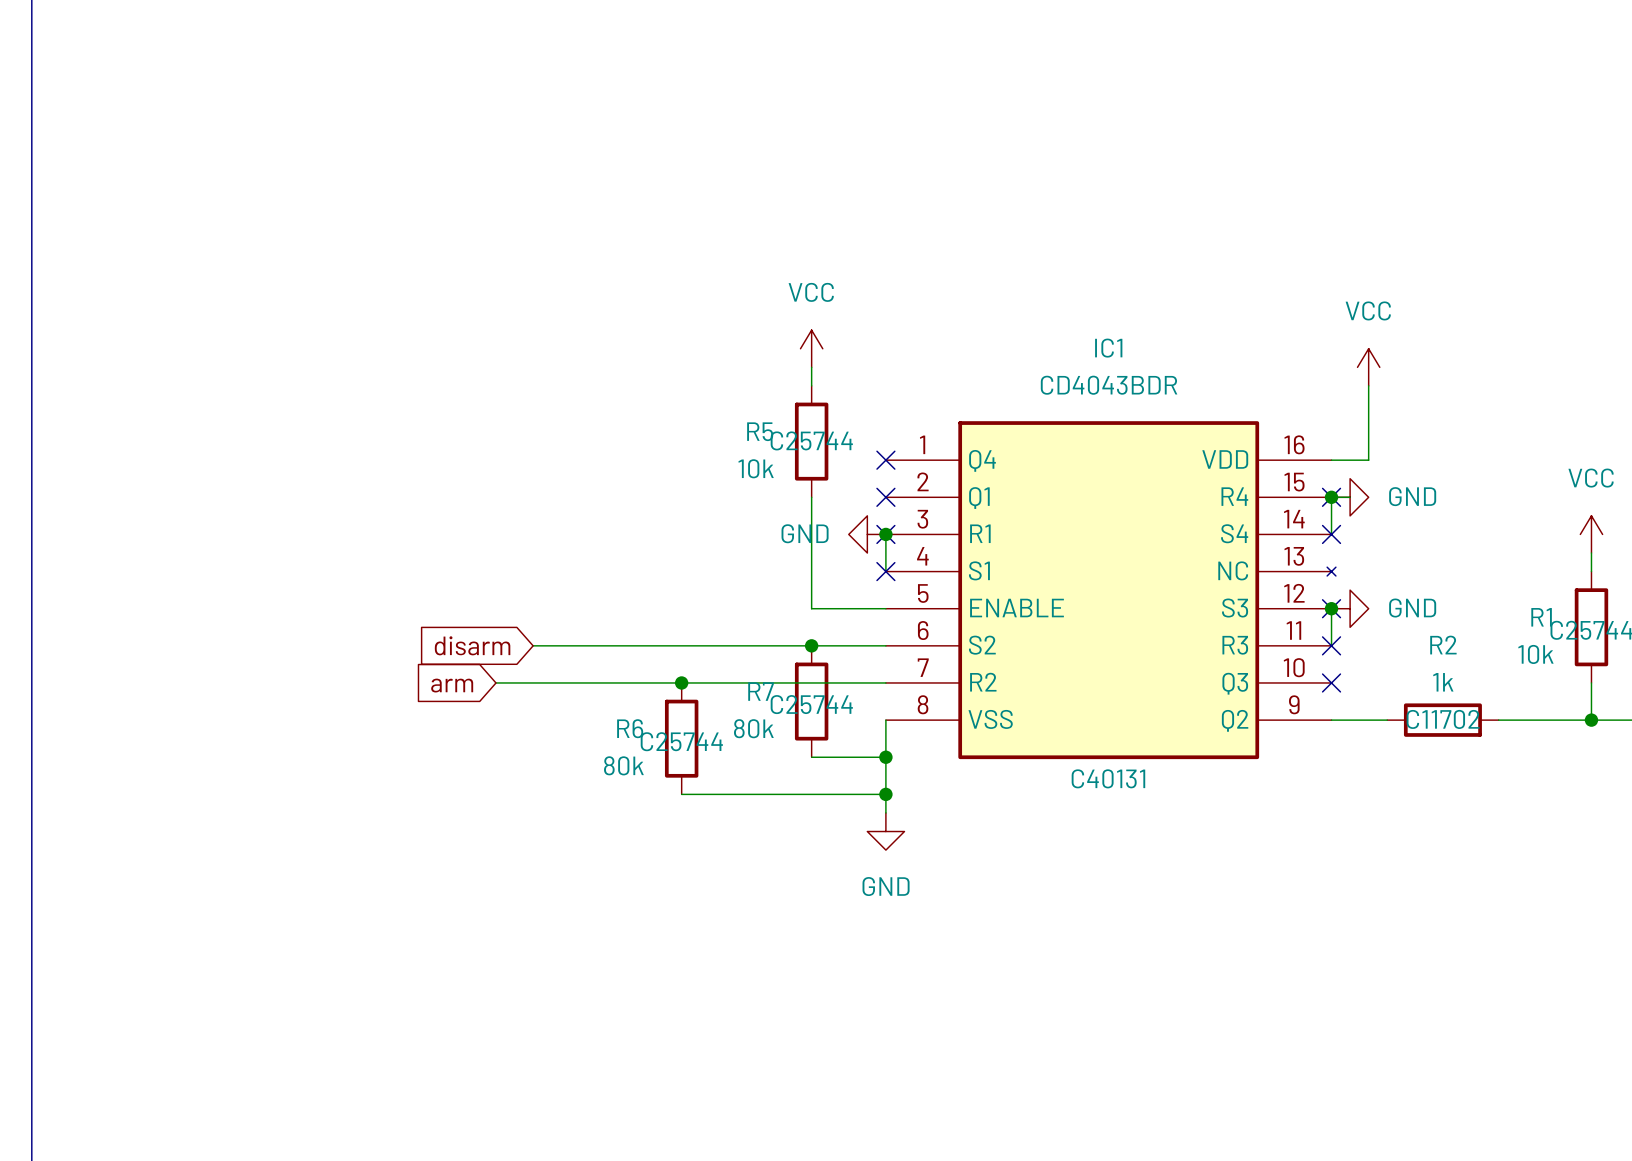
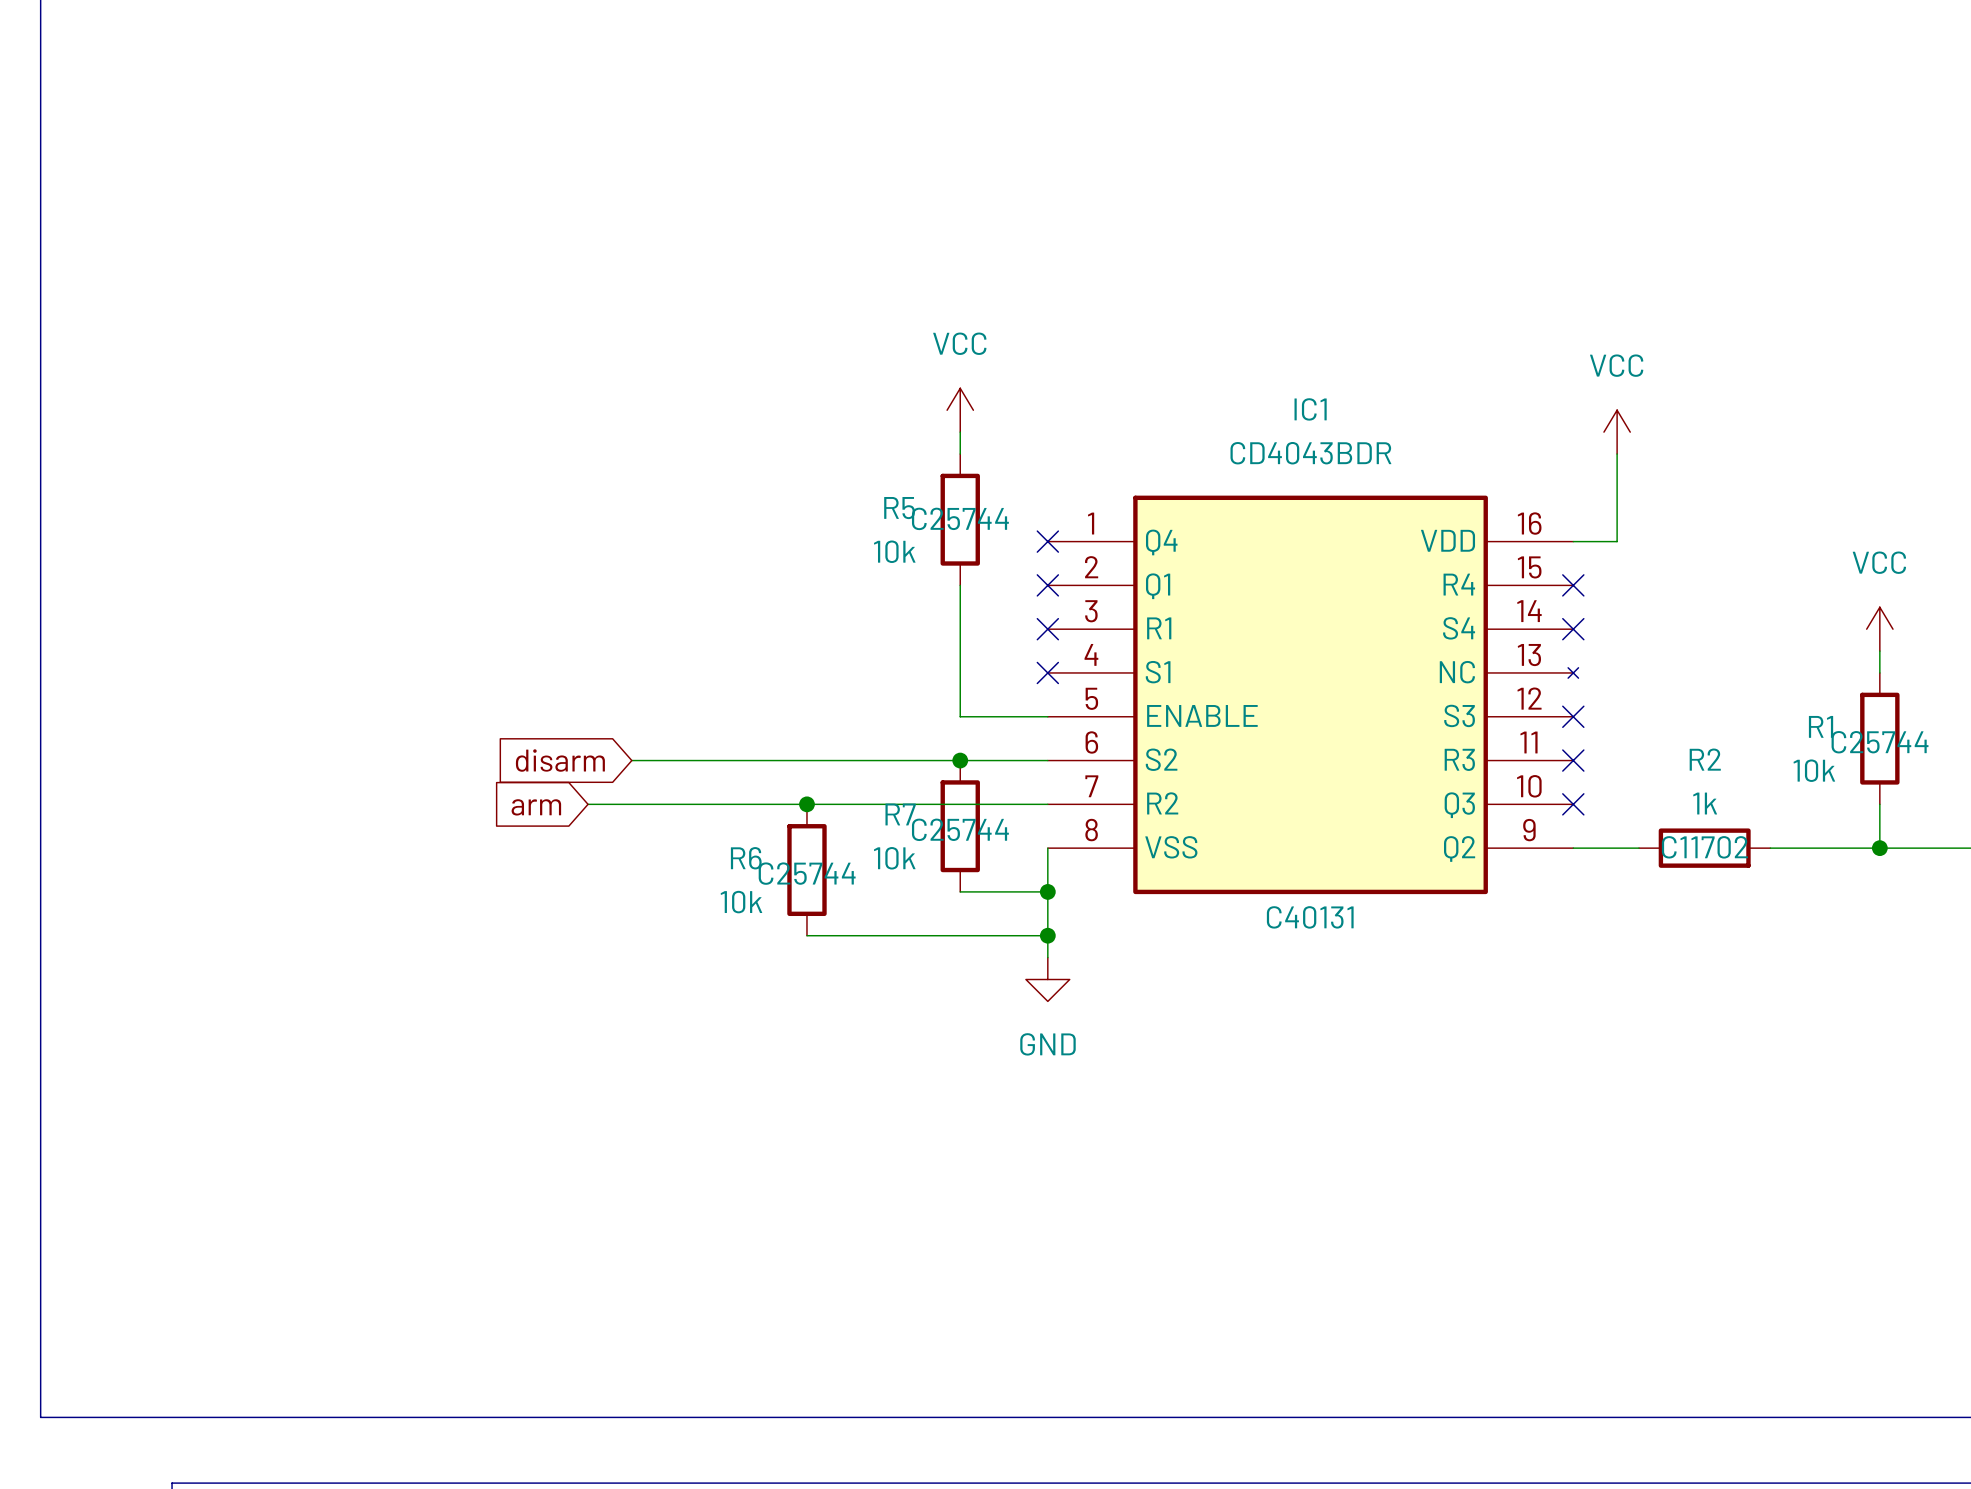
junction: (1331, 497) -> none
wire: (1350, 497) (1331, 497) (1331, 534) -> none
power symbol: GND (1350, 497) -> none
power symbol: GND (867, 534) -> none
wire: (885, 534) (885, 571) -> none
junction: (885, 534) -> none
wire: (1331, 608) (1331, 645) -> none
junction: (1331, 608) -> none
power symbol: GND (1350, 608) -> none
R7 value: 80k (753, 728) -> 10k (894, 858)
R6 value: 80k (623, 765) -> 10k (741, 902)

